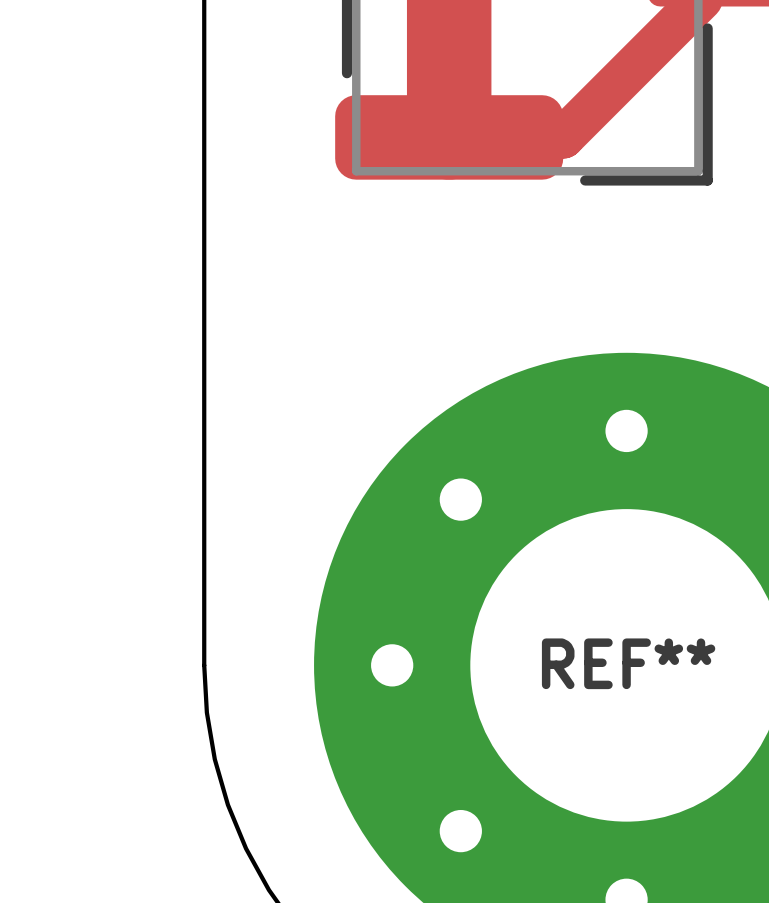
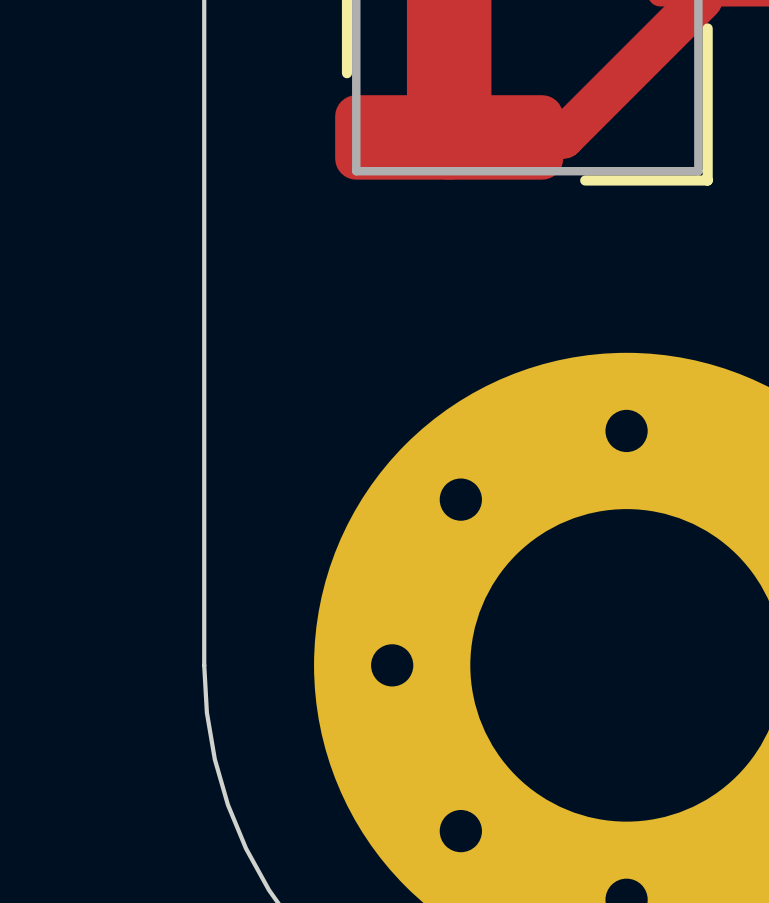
REF** name: REF** (628, 663) -> none

